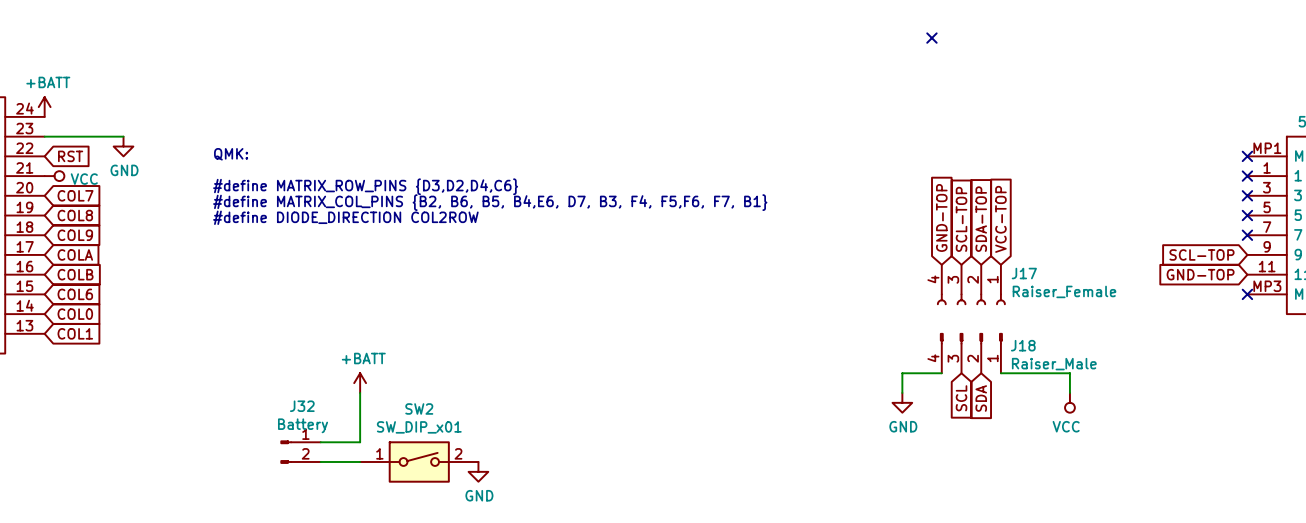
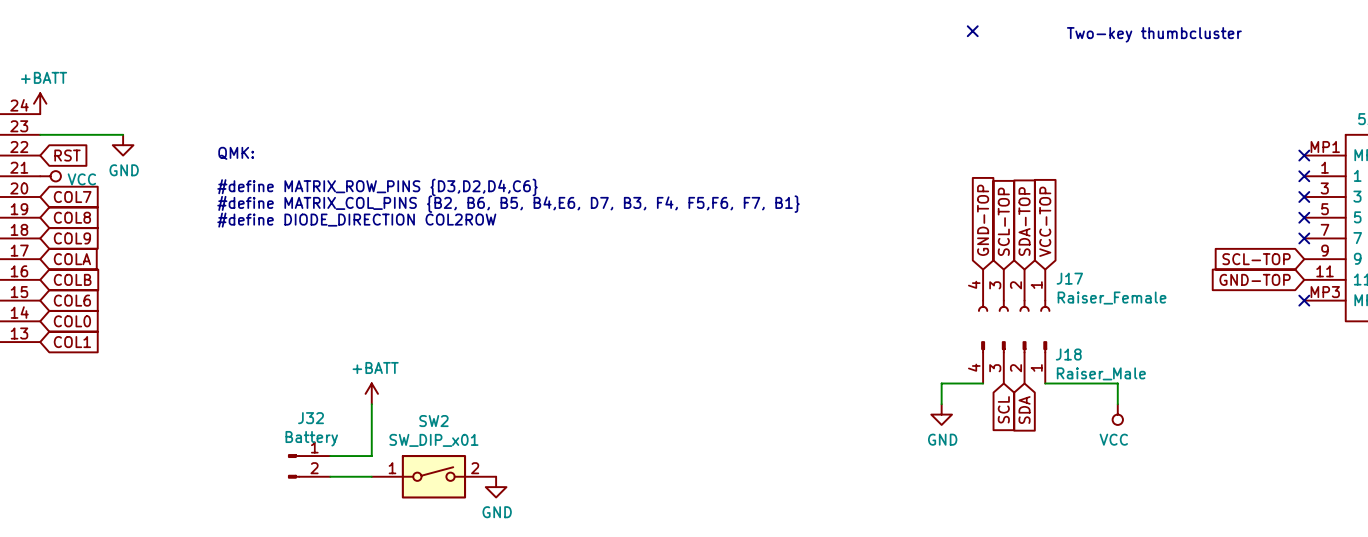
text: none -> Two-key thumbcluster (1154, 34)

